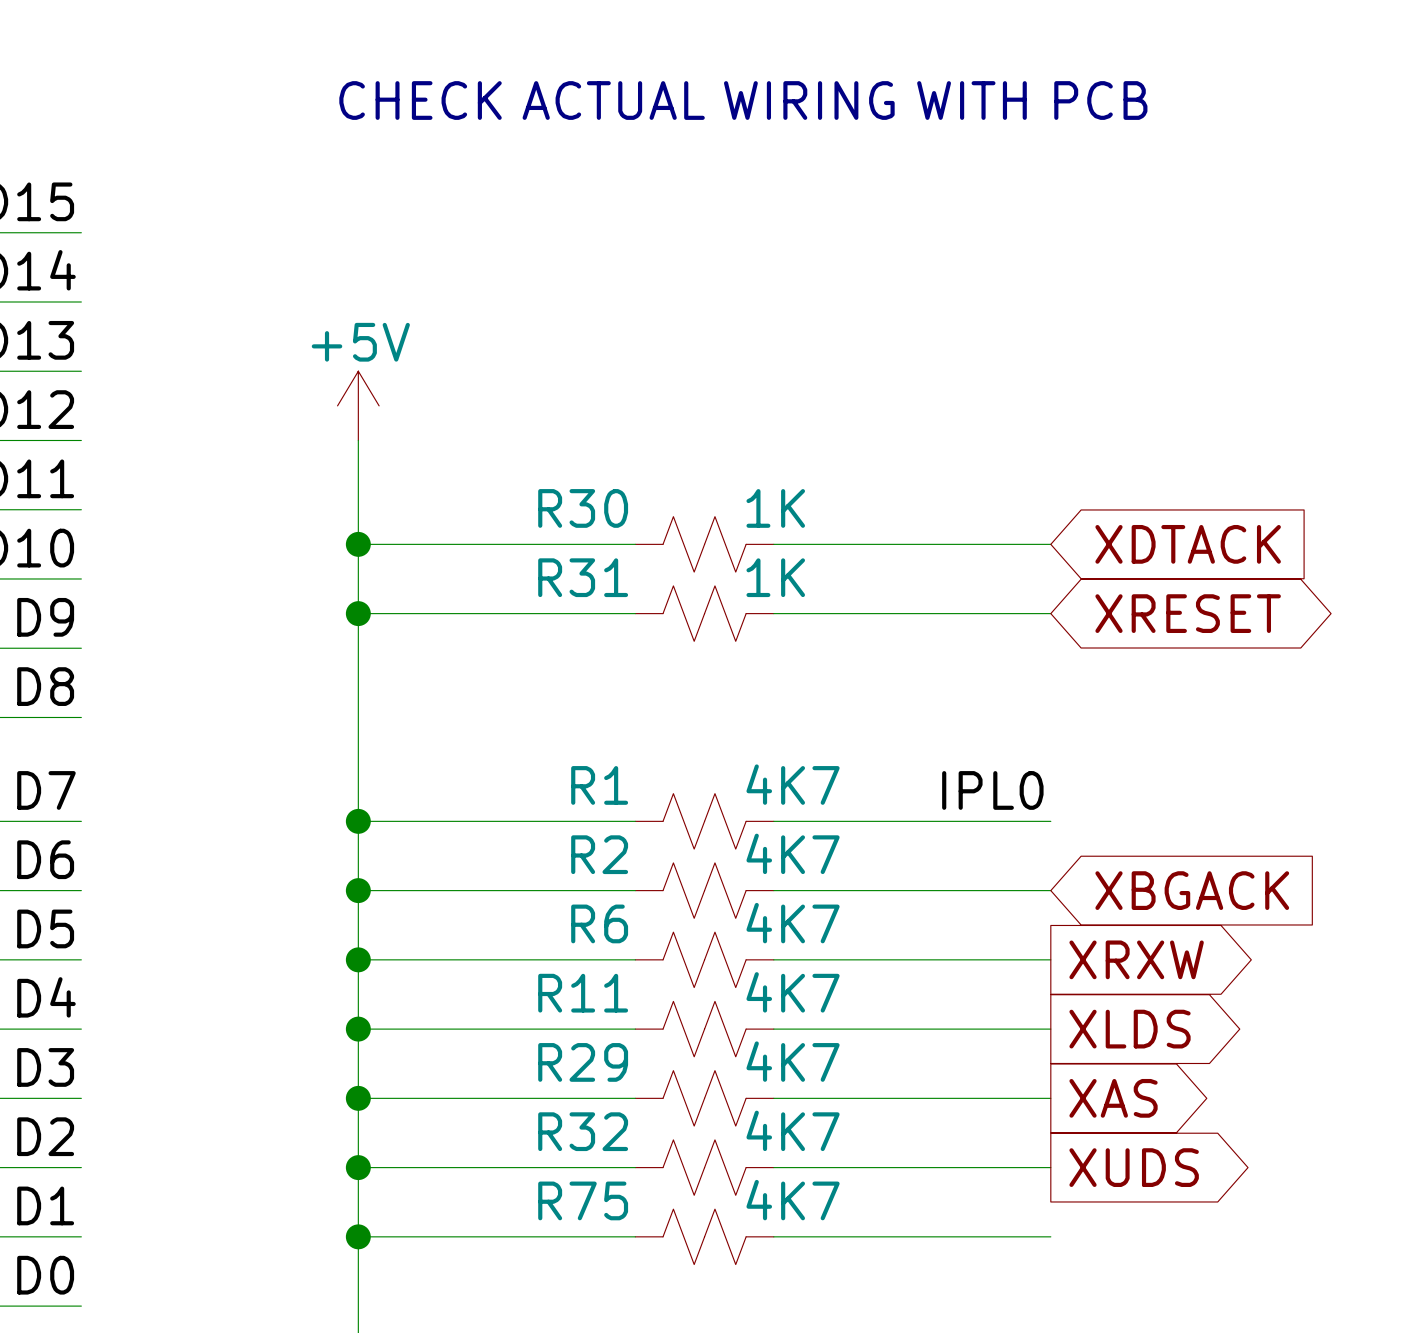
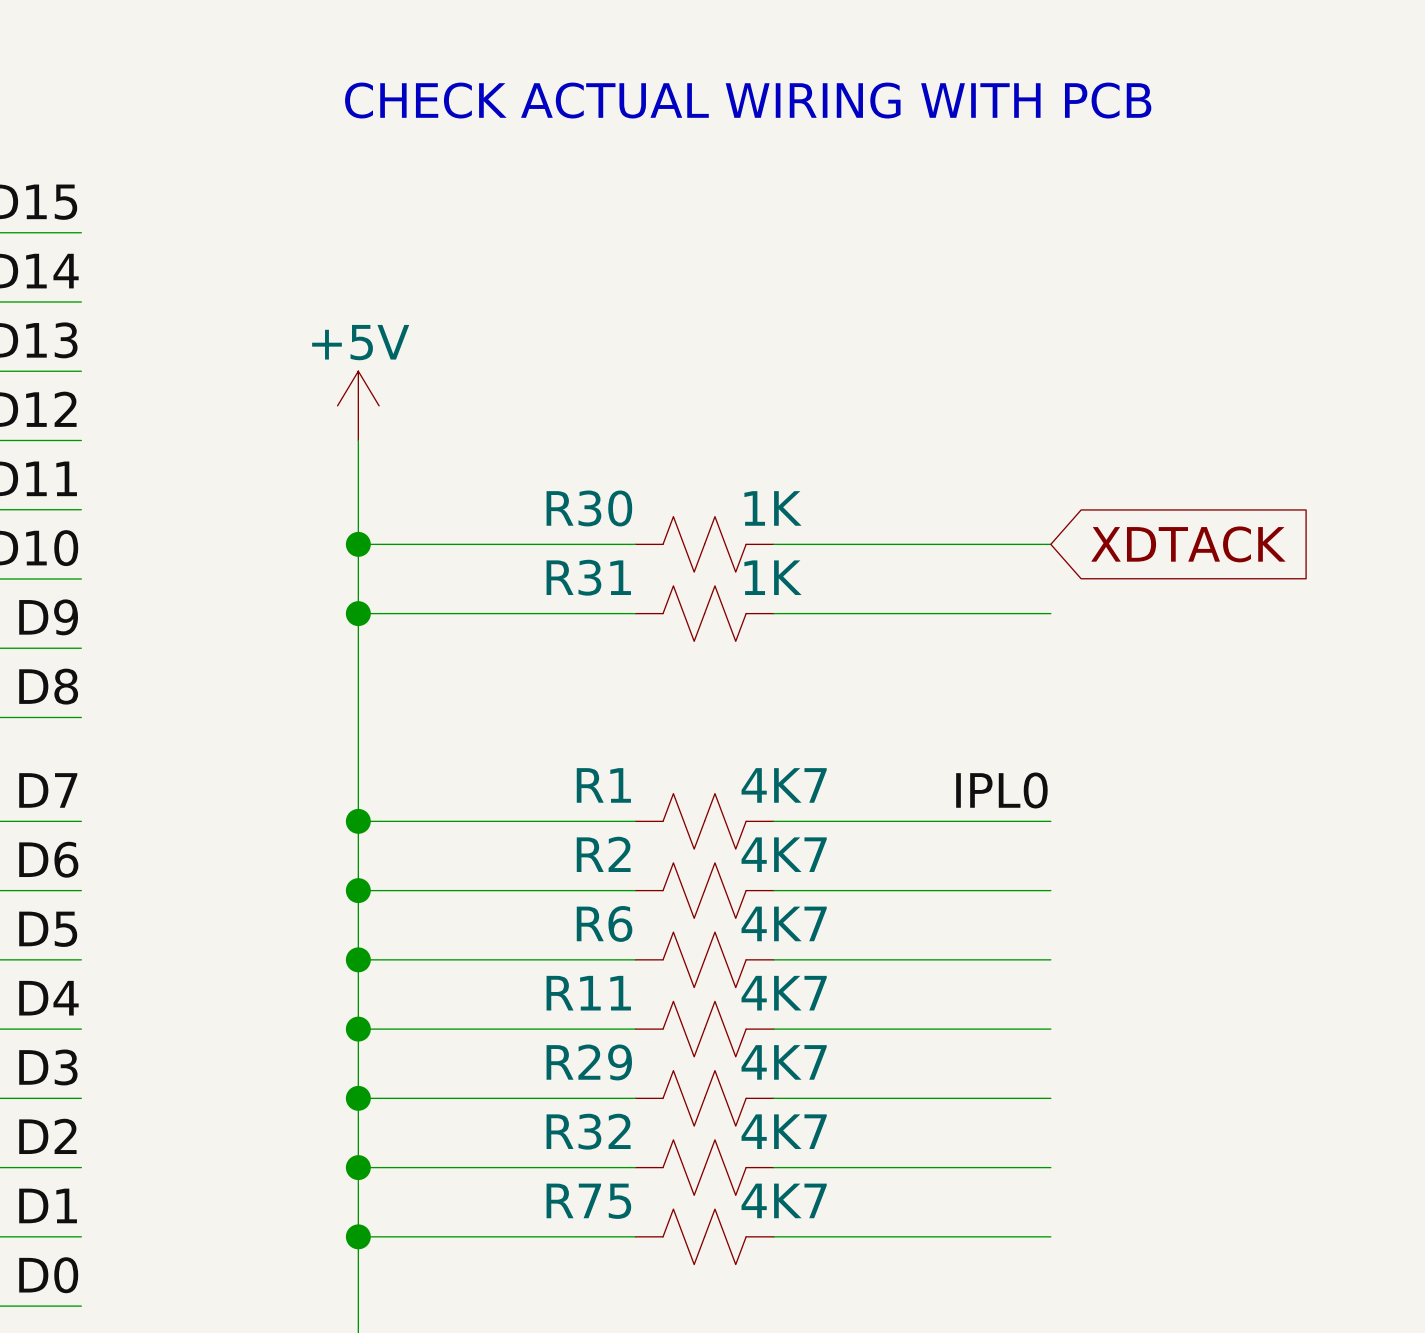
global label: XRESET (1188, 613) -> none
global label: XBGACK (1192, 890) -> none
global label: XRXW (1136, 959) -> none
global label: XLDS (1130, 1029) -> none
global label: XAS (1113, 1098) -> none
global label: XUDS (1134, 1167) -> none

